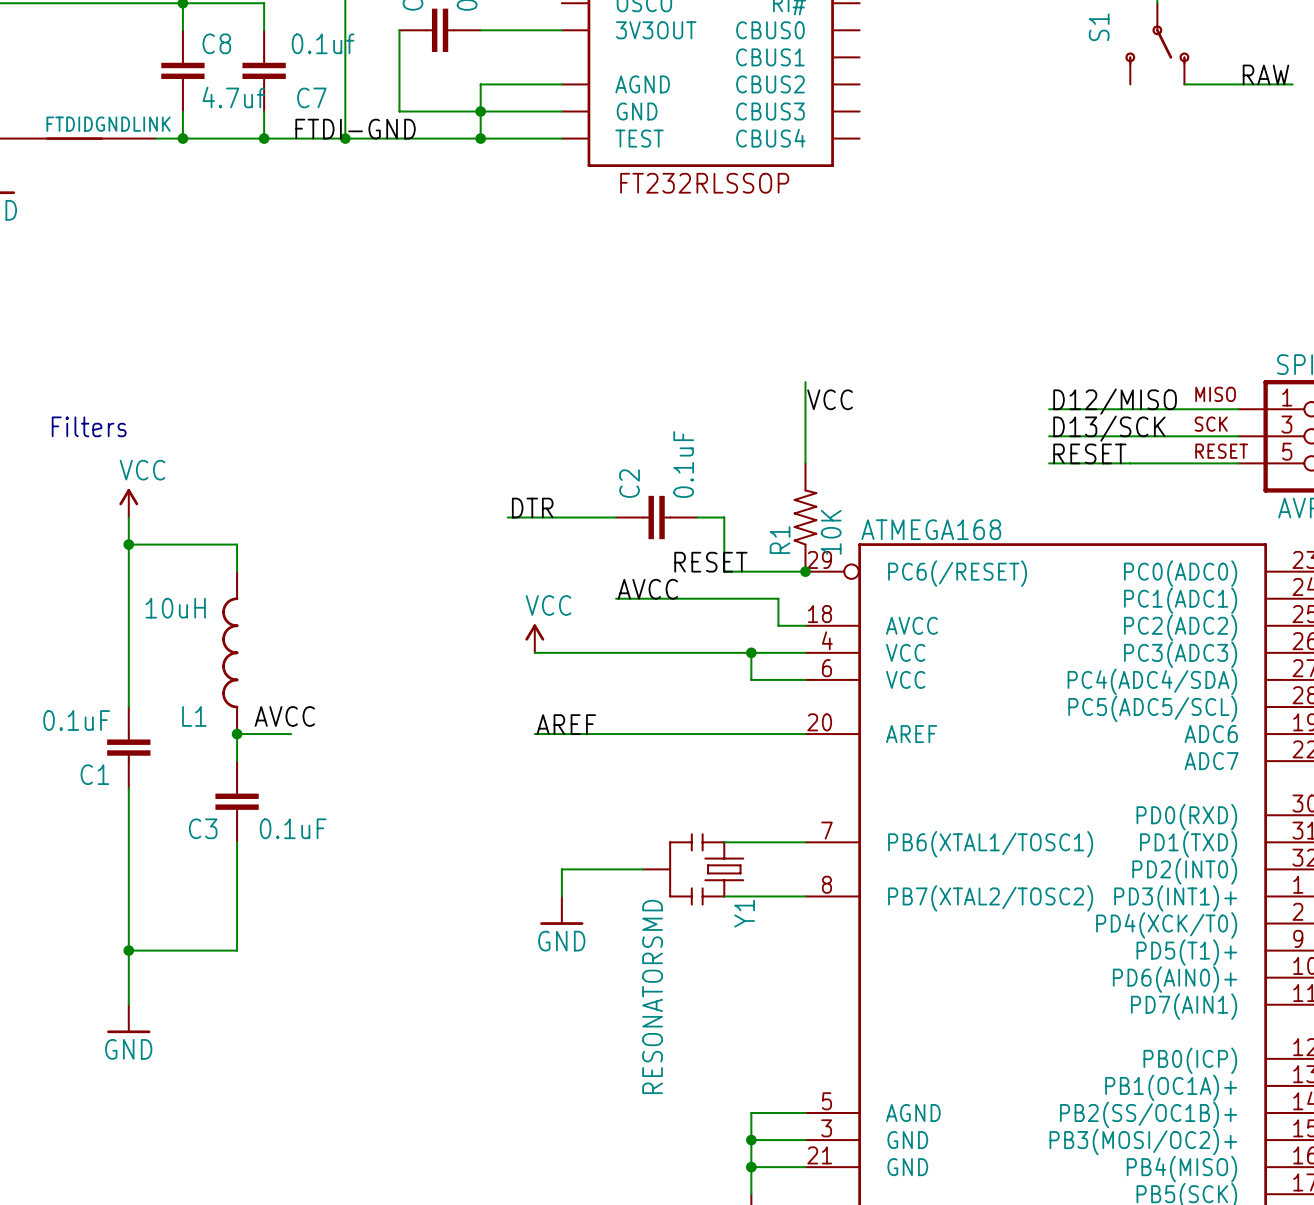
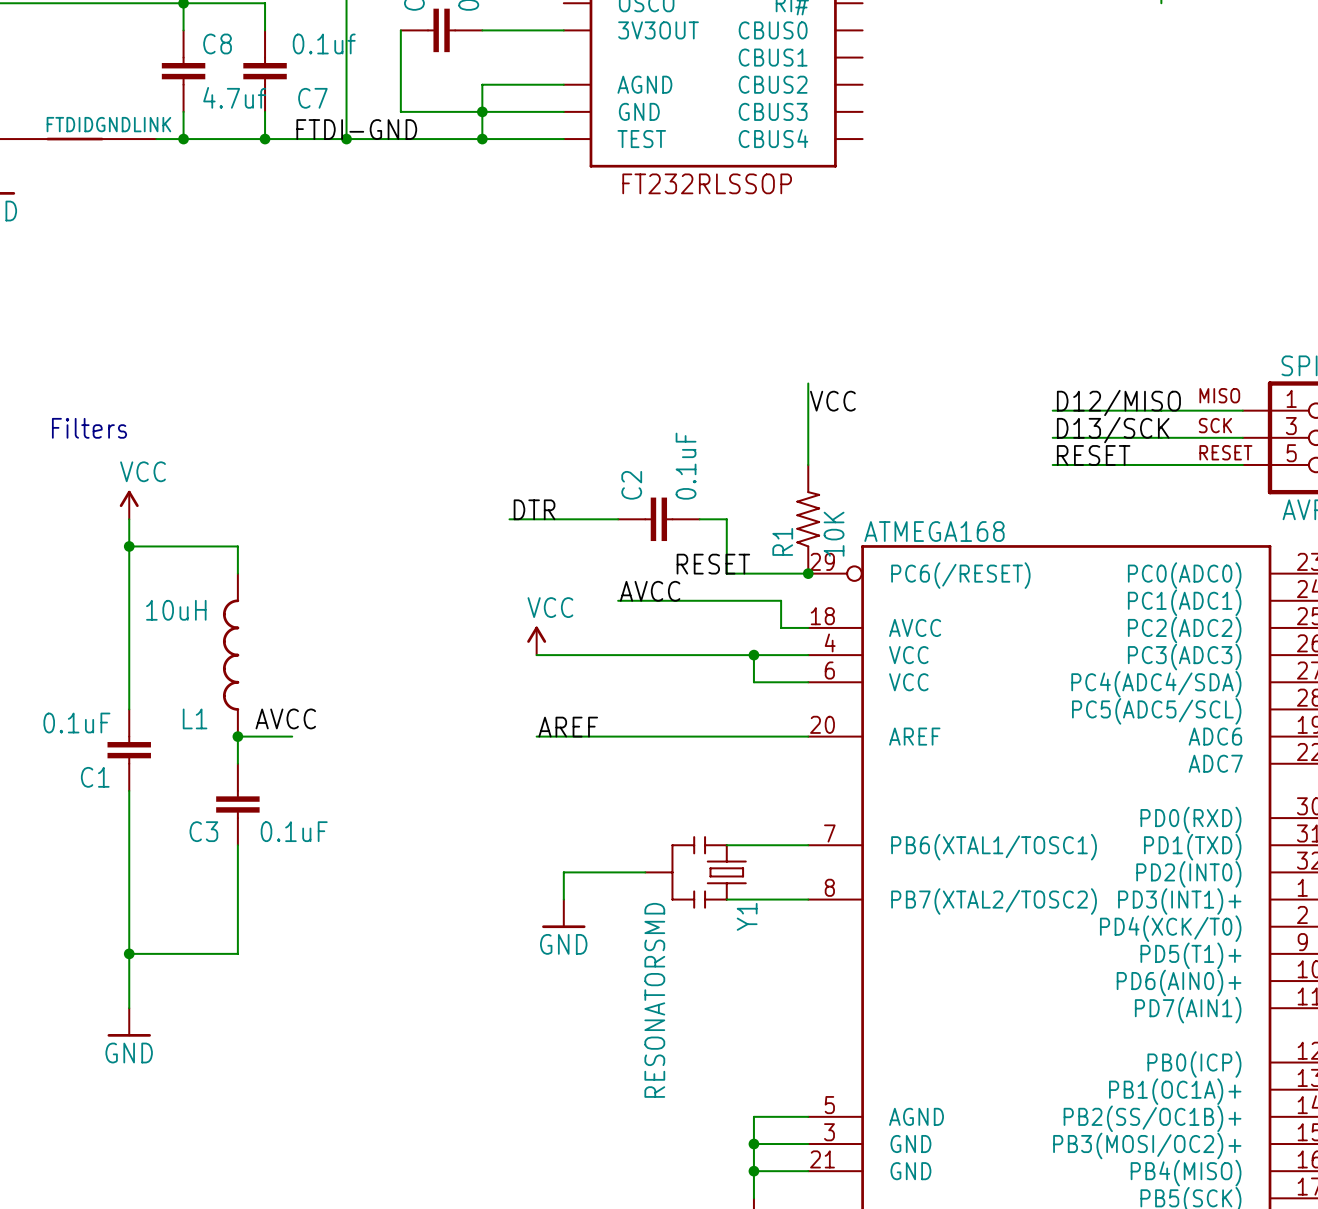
S1: (1157, 43) -> none
label: RAW (1265, 74) -> none
wire: (1184, 84) (1292, 84) -> none

